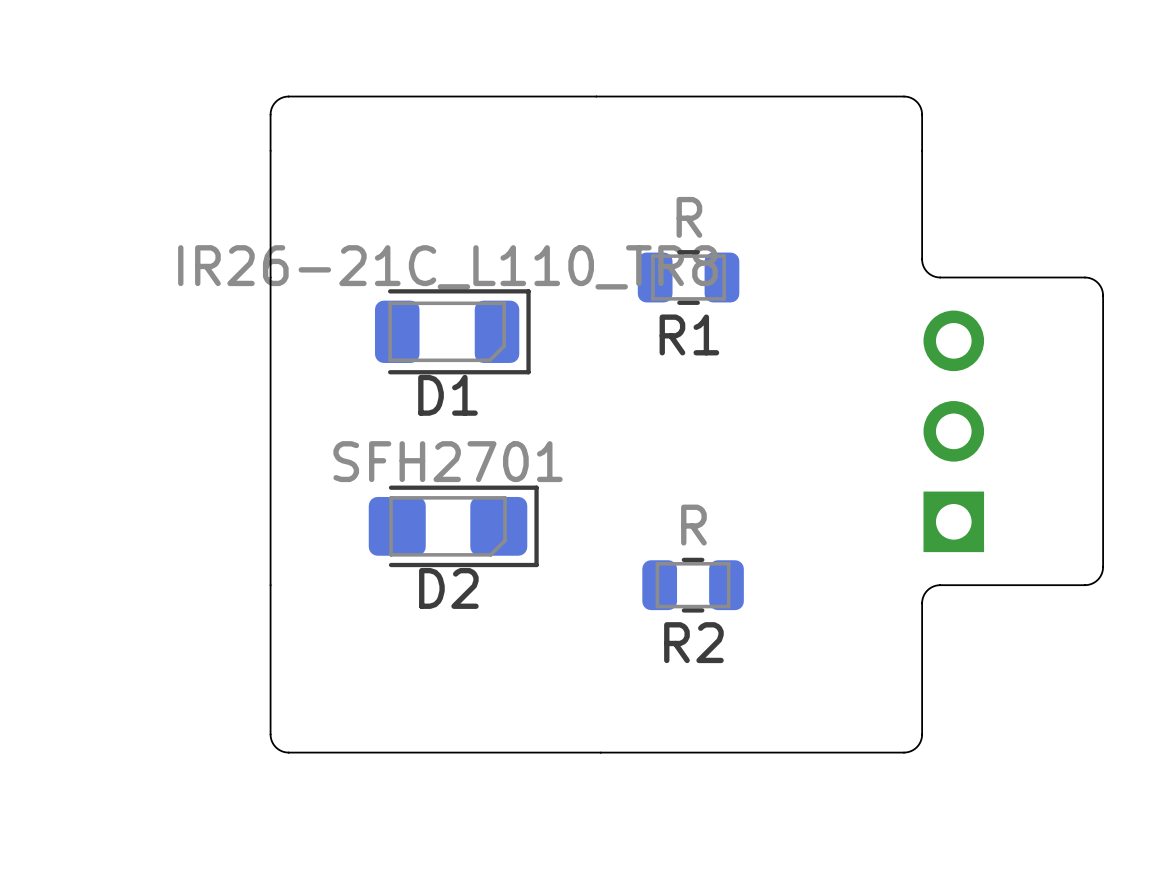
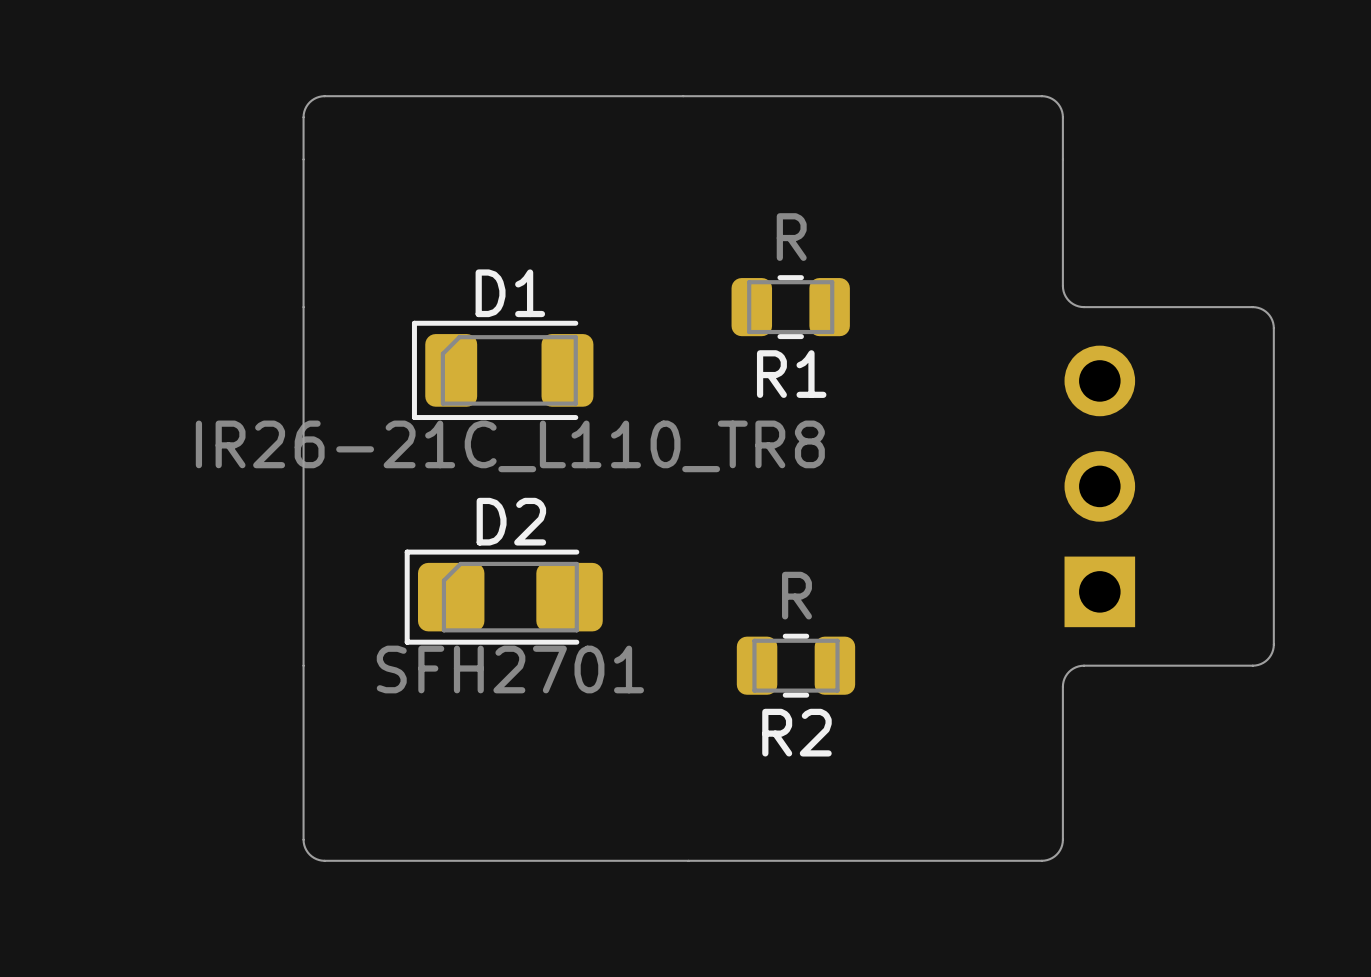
D1 rotation: 0° (452, 331) -> 180° (502, 370)
D2 rotation: 0° (453, 526) -> 180° (503, 597)

